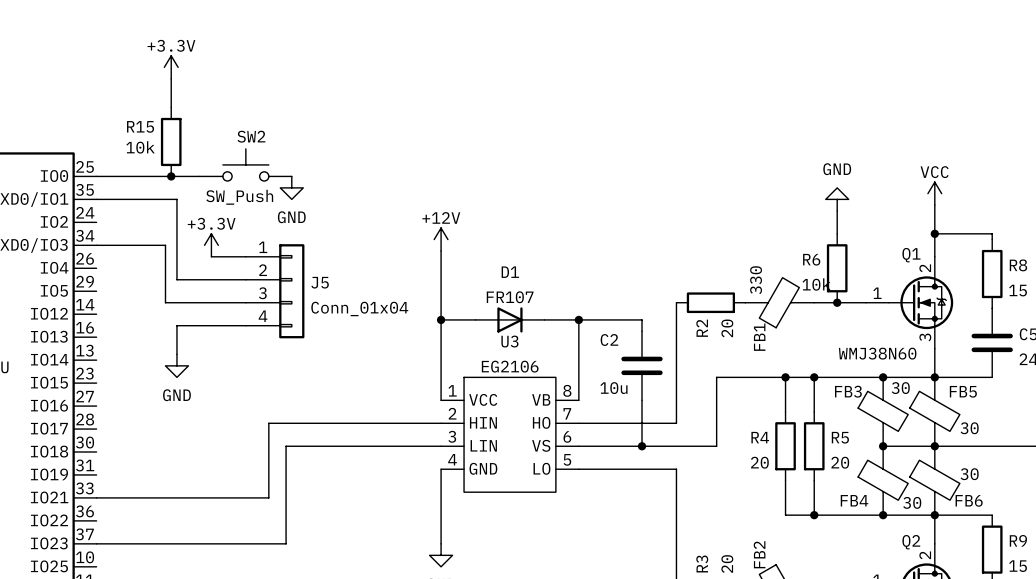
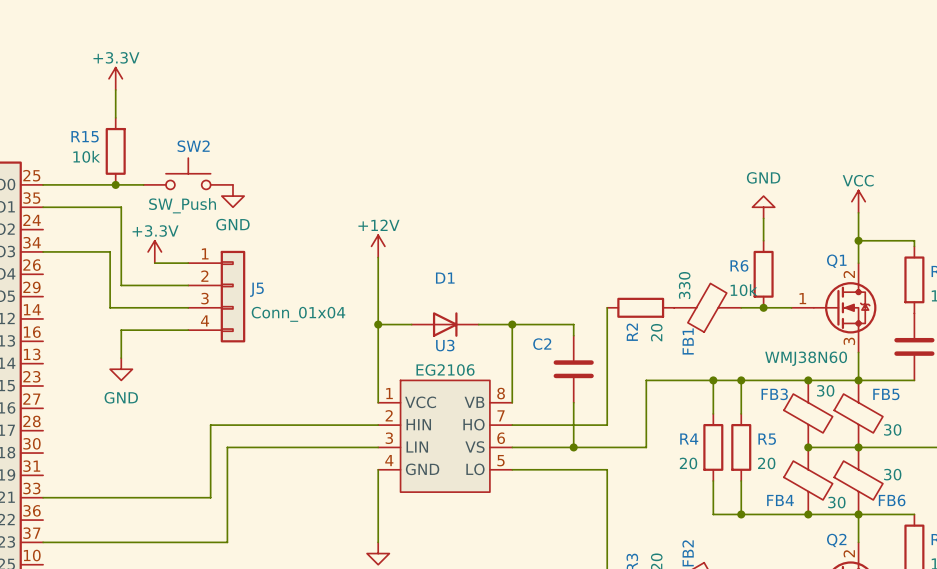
D1 value: FR107 (510, 297) -> none
C2 value: 10u (613, 388) -> none

